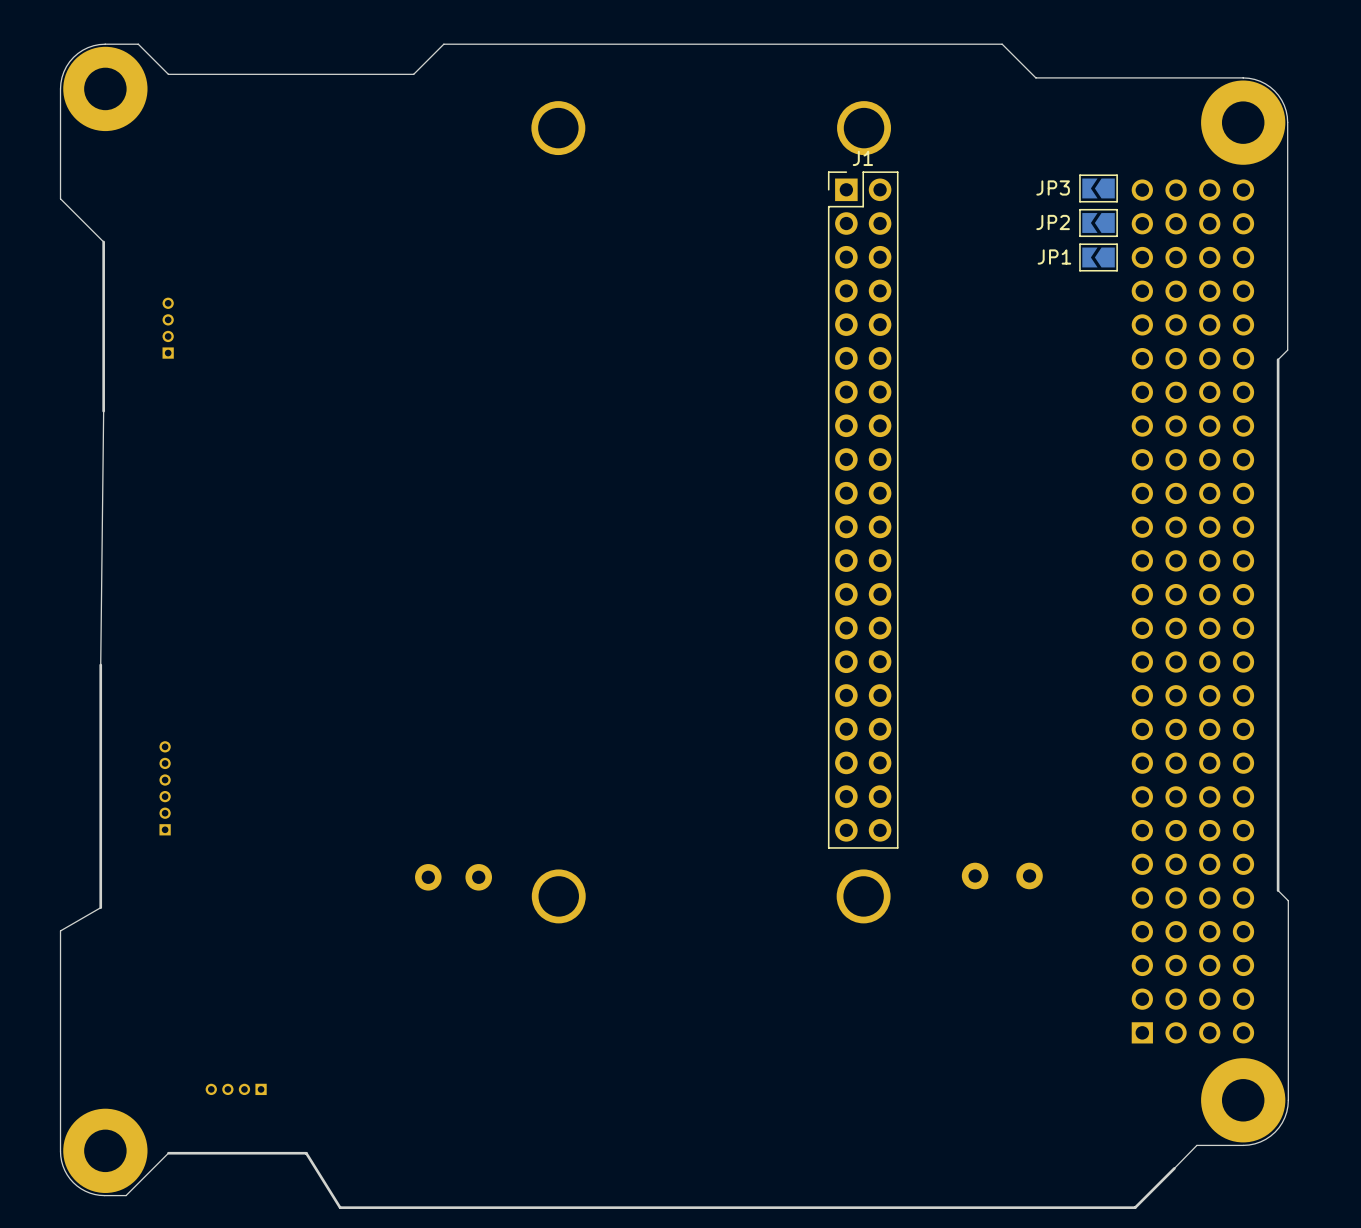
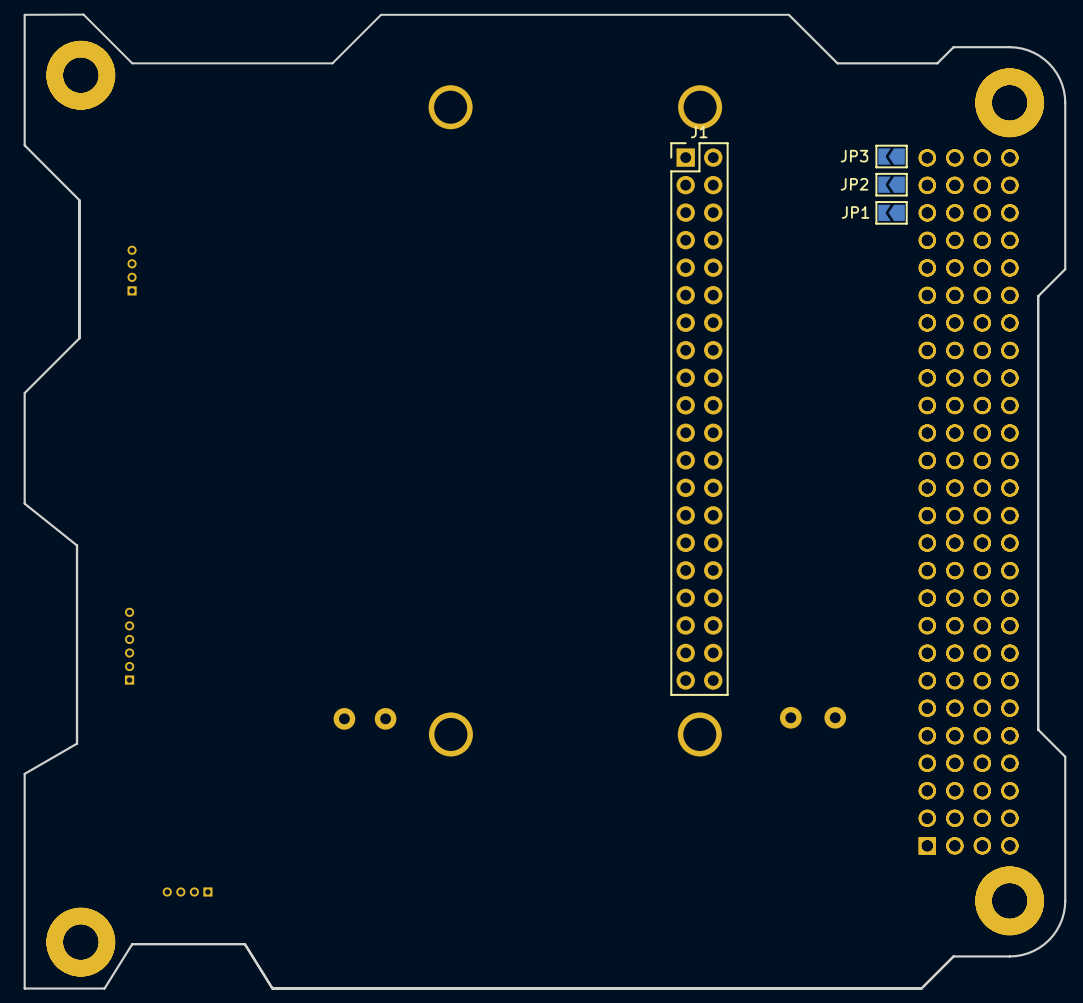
board edge: (138, 44) (99, 44) (82, 50) (69, 61) (63, 71) (60, 83) (60, 198) (103, 241) -> (107, 38) (83, 14) (24, 14)
board edge: (443, 44) (1002, 44) (1035, 77) (1243, 77) (1260, 81) (1270, 87) (1278, 95) (1286, 110) (1287, 122) (1287, 350) (1278, 359) -> (357, 38) (381, 14) (788, 14)
board edge: (103, 411) (100, 664) -> none
part: none -> (544, 501)
board edge: (1278, 890) (1288, 900) (1288, 1100) (1284, 1117) (1275, 1132) (1260, 1141) (1243, 1145) (1196, 1145) (1174, 1168) -> none
board edge: (100, 907) (60, 930) (61, 1161) (70, 1178) (85, 1191) (99, 1195) (126, 1195) (168, 1153) -> none

